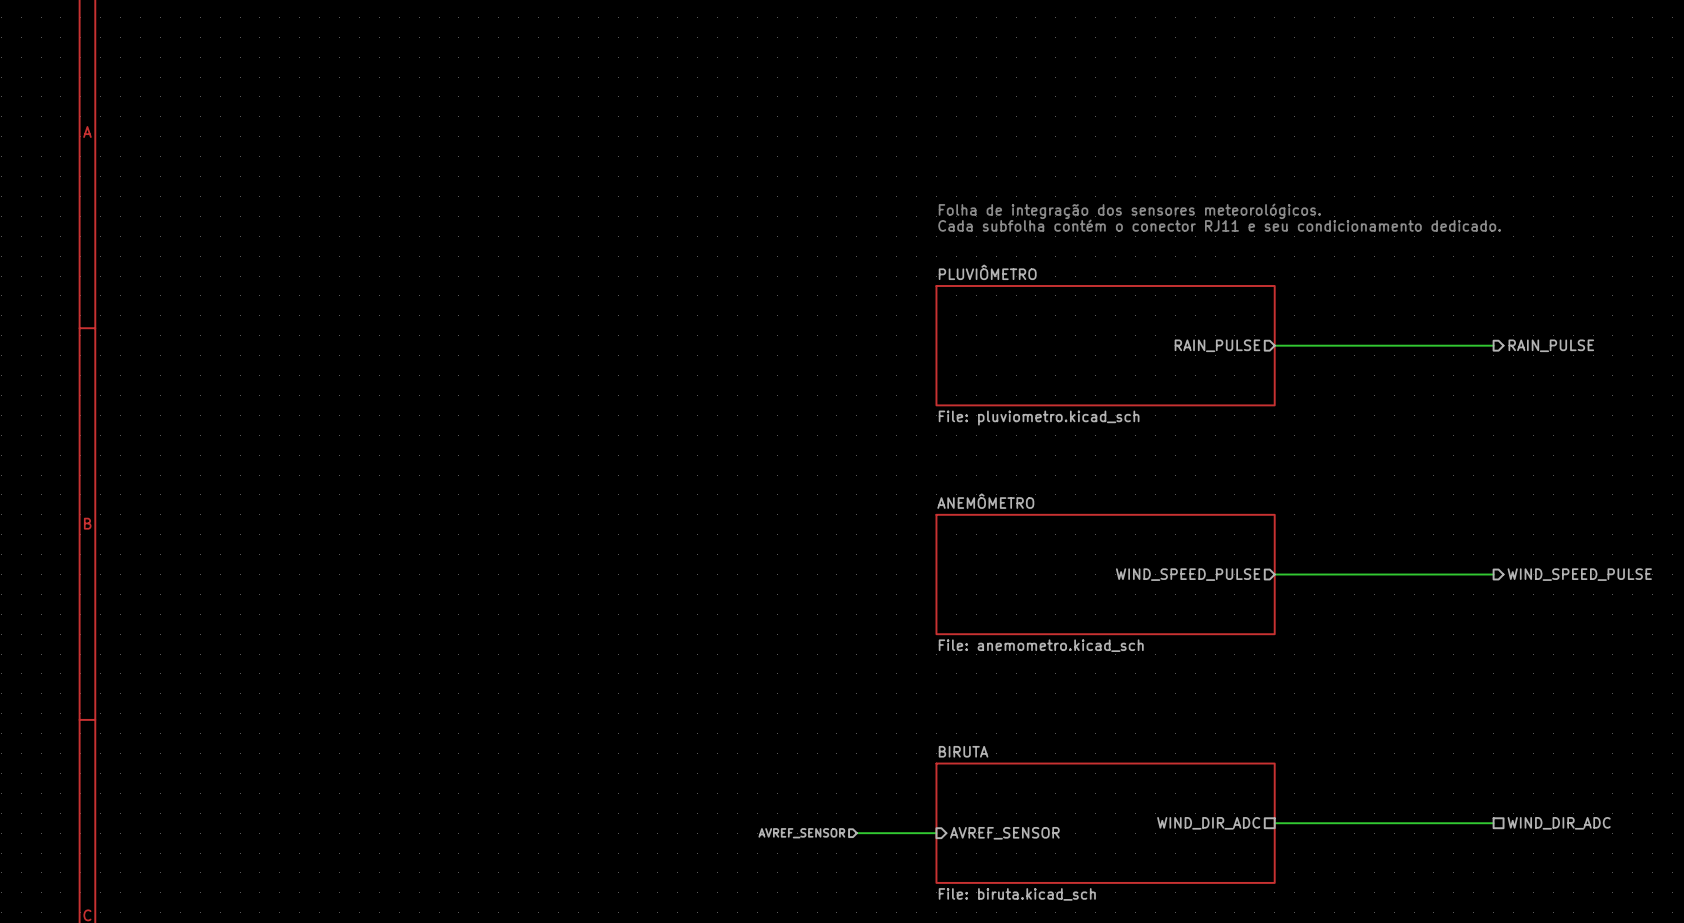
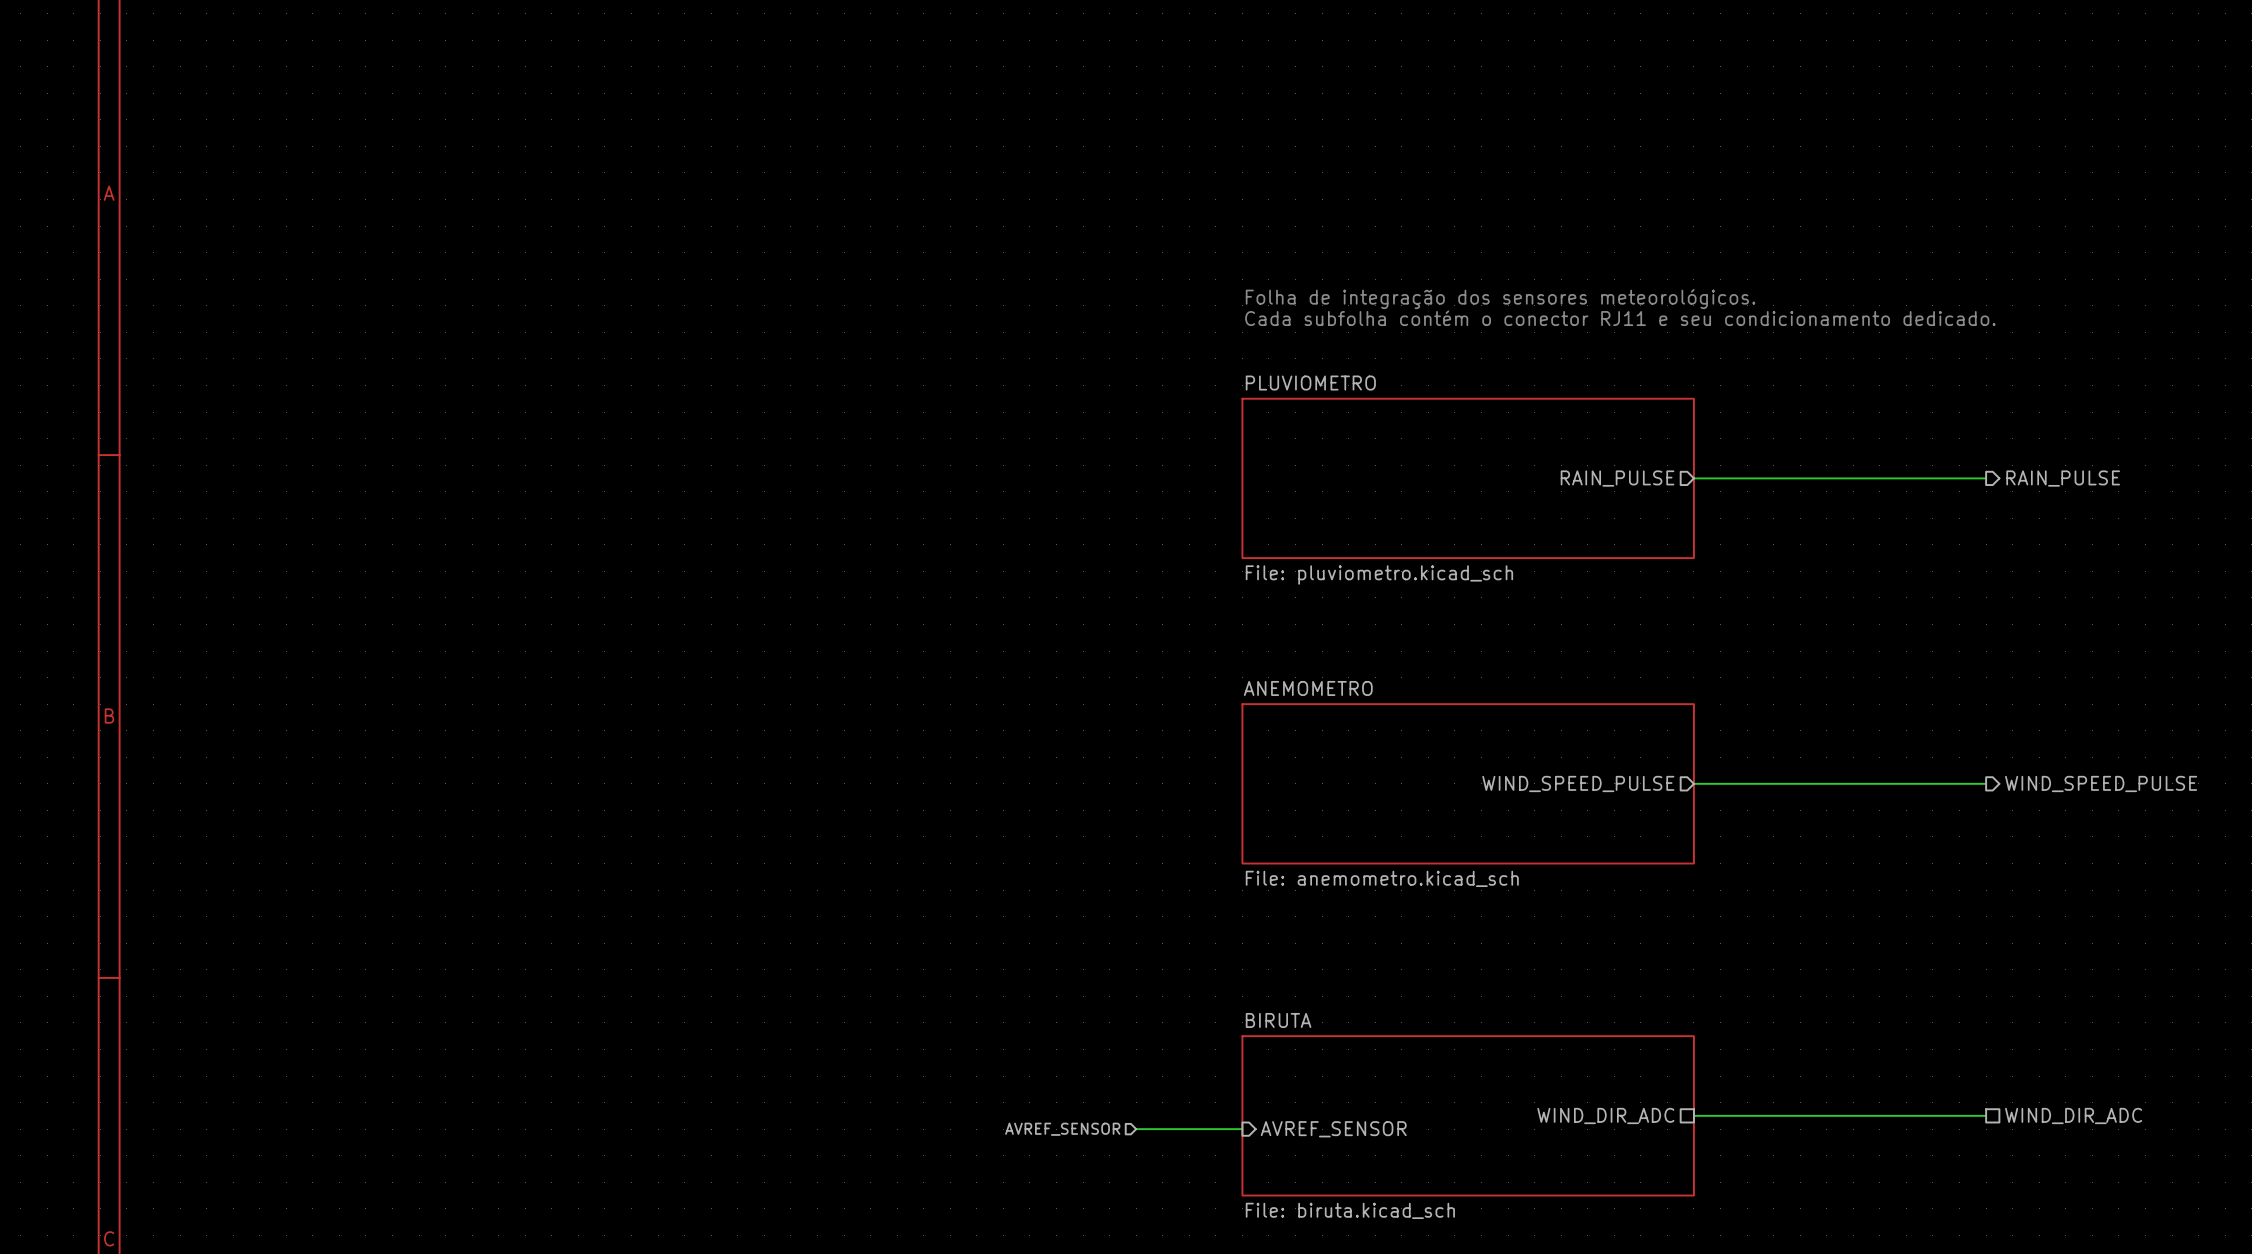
sheet PLUVIÔMETRO name: PLUVIÔMETRO (987, 272) -> PLUVIOMETRO (1310, 383)
sheet ANEMÔMETRO name: ANEMÔMETRO (985, 501) -> ANEMOMETRO (1308, 688)

